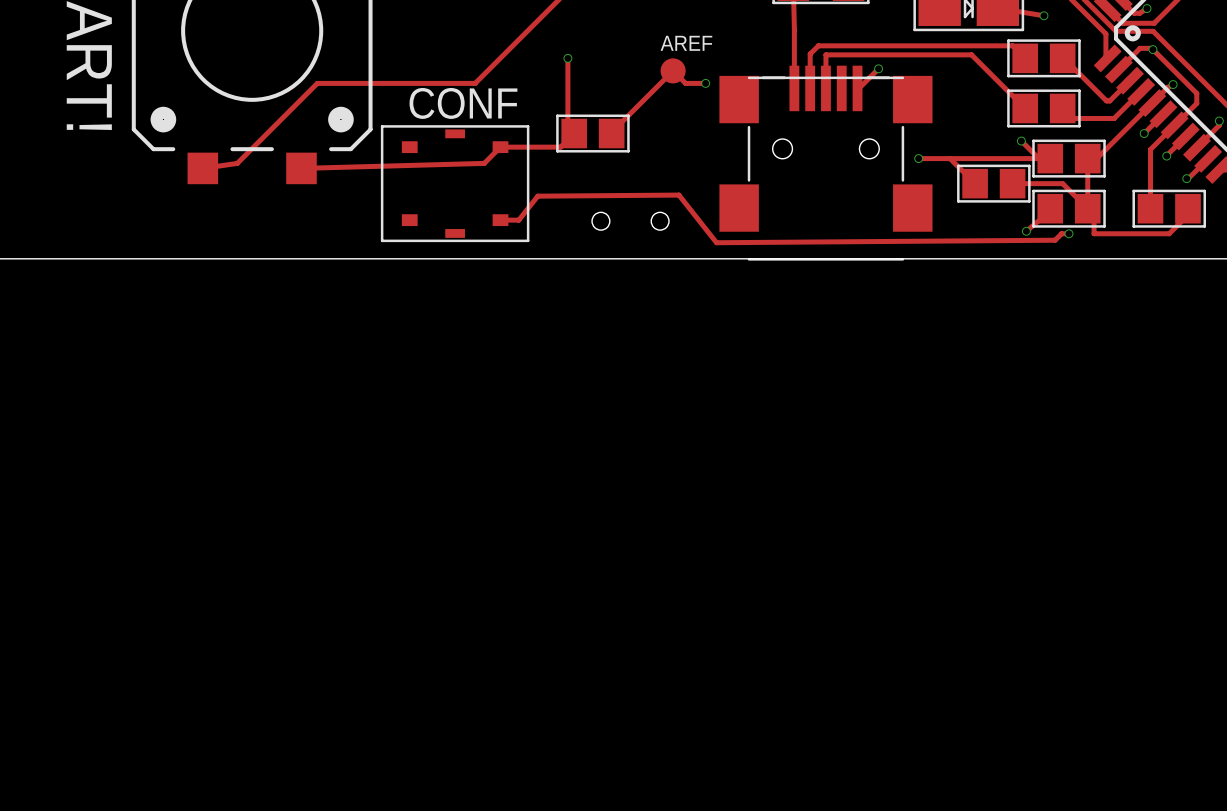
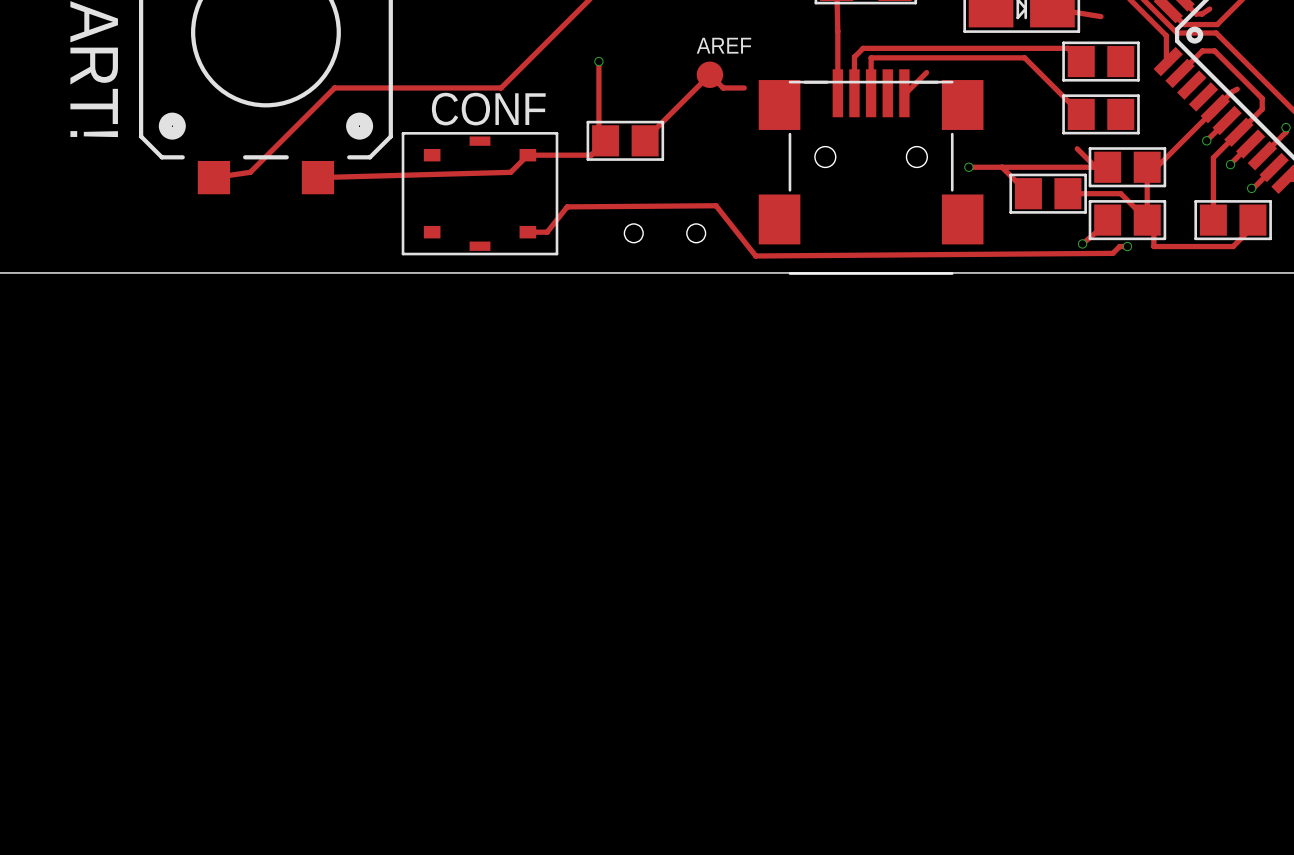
via: (1146, 8) -> none
via: (1043, 15) -> none
via: (1152, 49) -> none
track: (1062, 58) (1106, 100) (1109, 100) (1130, 80) -> none
via: (878, 68) -> none
via: (705, 83) -> none
via: (1173, 84) -> none
track: (1141, 91) (1114, 118) (1072, 118) (1062, 108) -> none
via: (1021, 141) -> none

